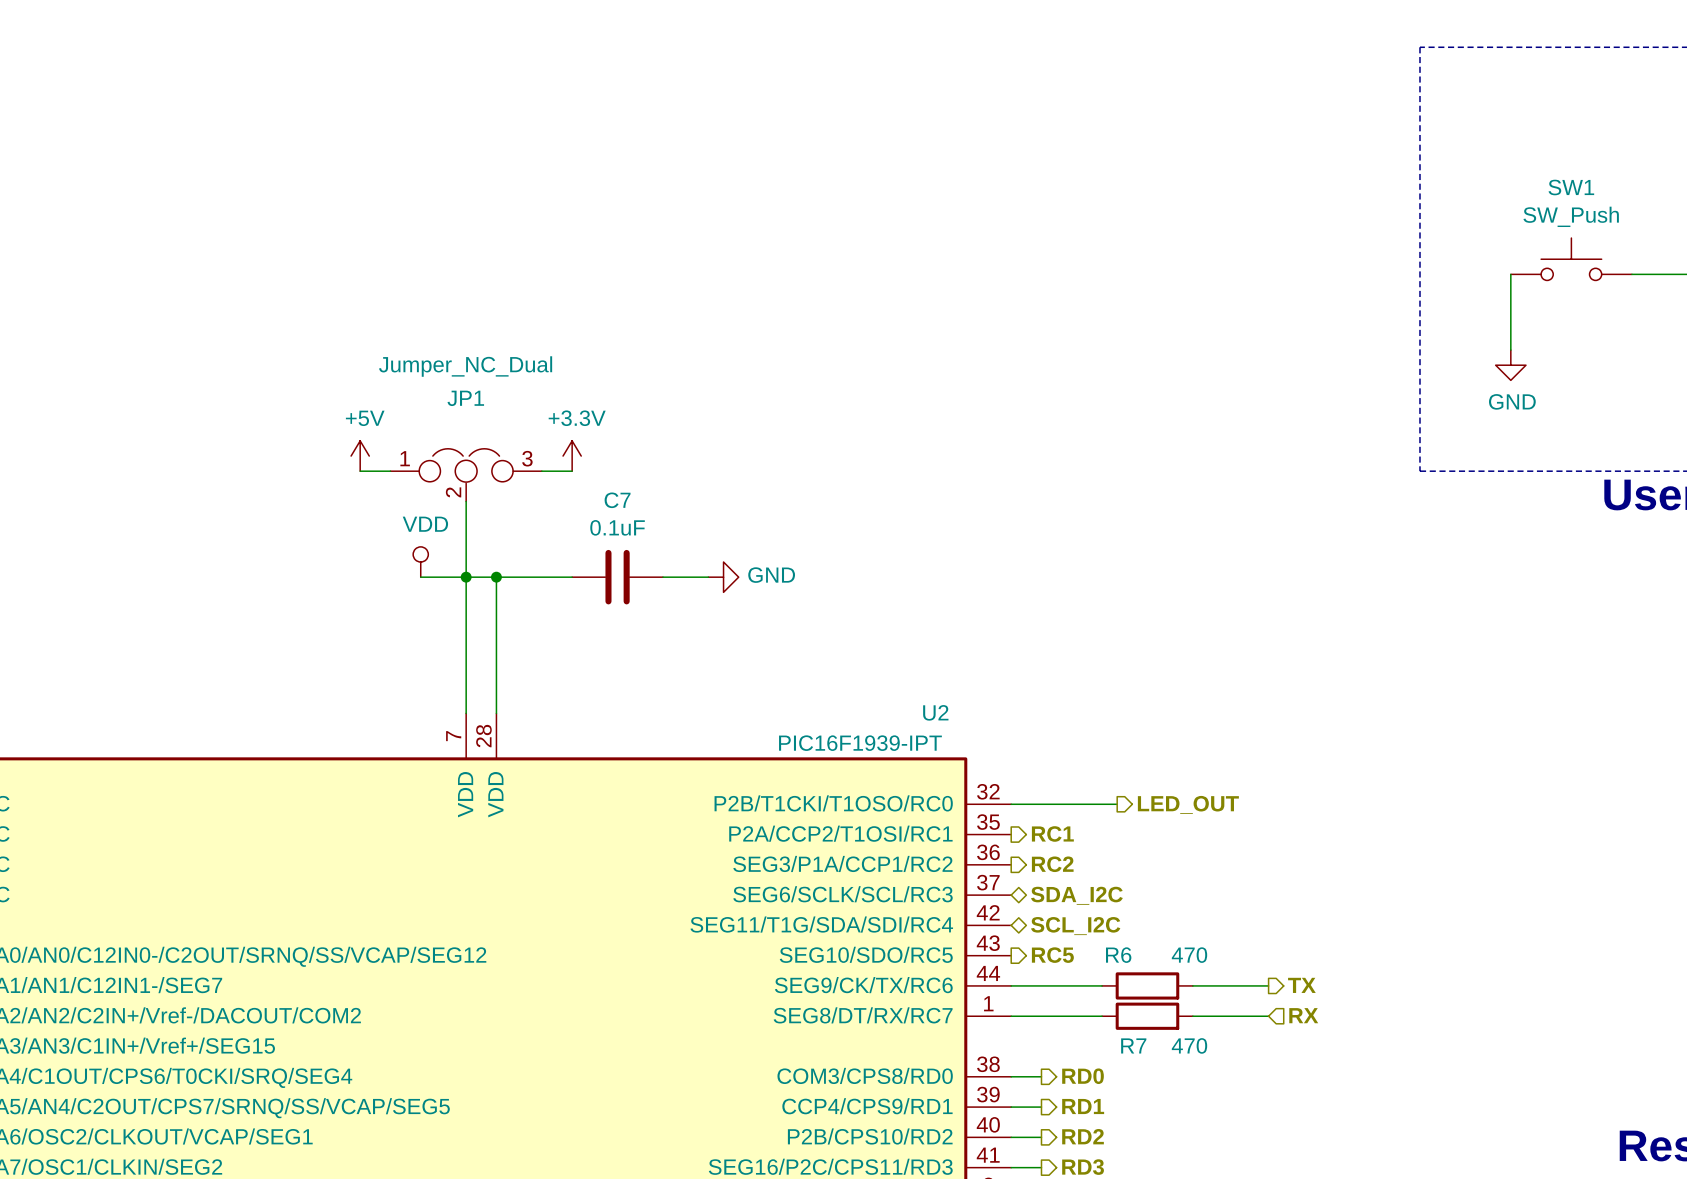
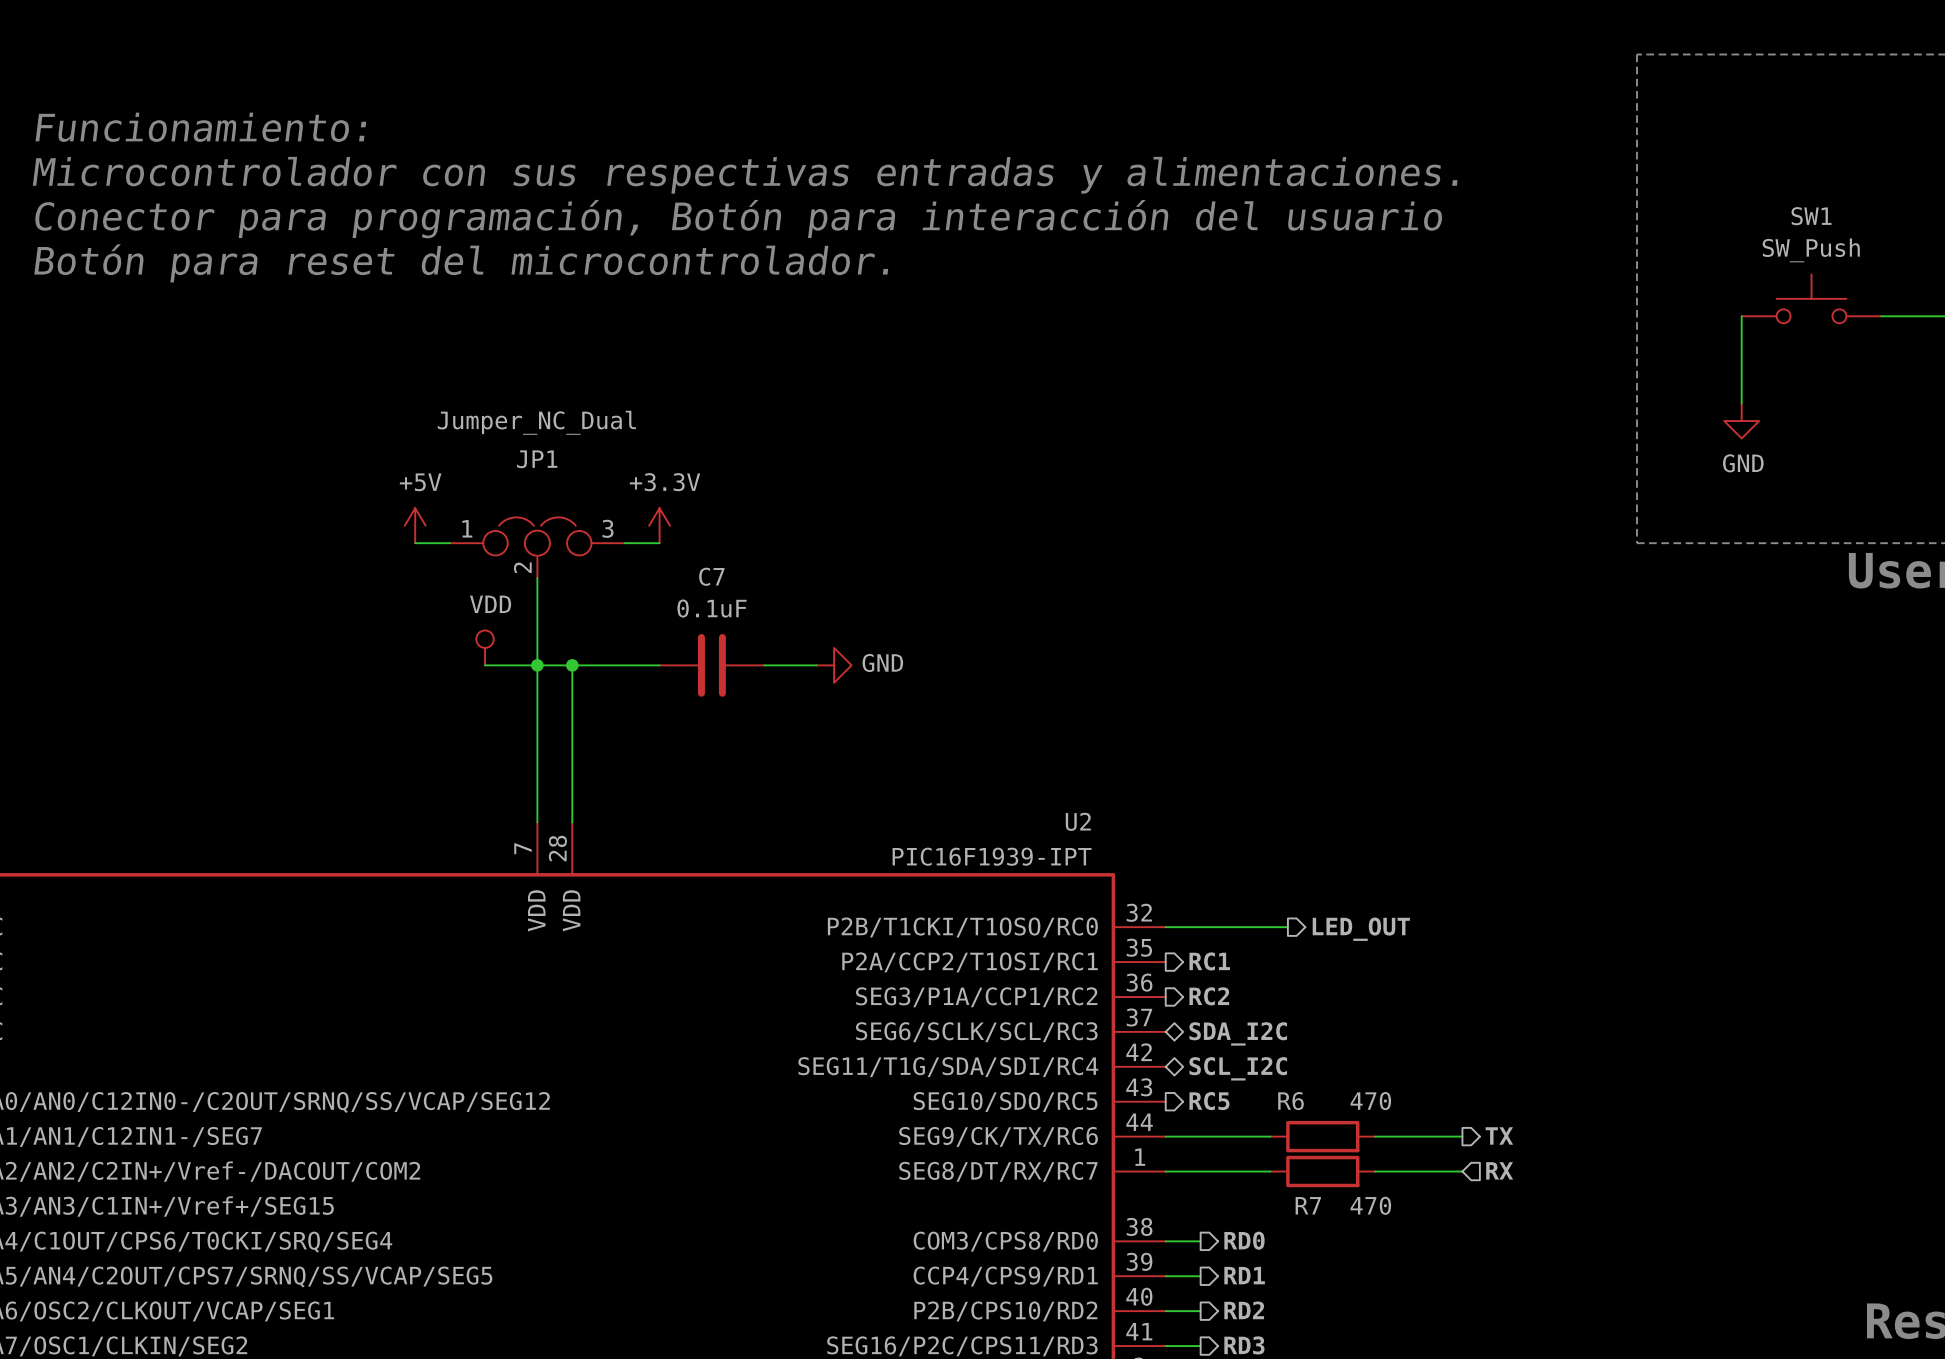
text: none -> Funcionamiento: (200, 127)
text: none -> Microcontrolador con sus respectivas entradas y alimentaciones. (745, 175)
text: none -> Conector para programación, Botón para interacción del usuario (738, 219)
text: none -> Botón para reset del microcontrolador. (461, 263)

